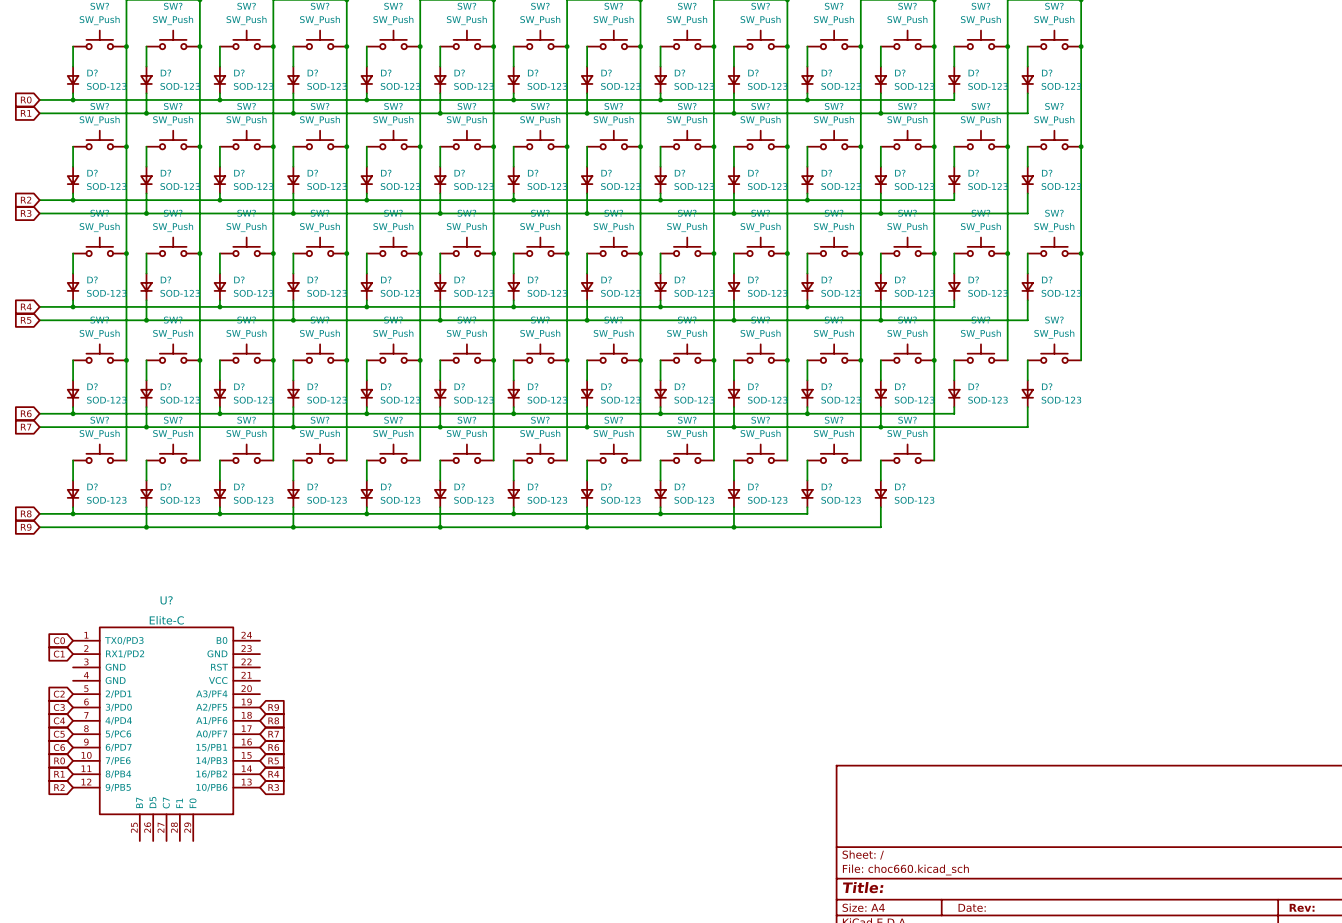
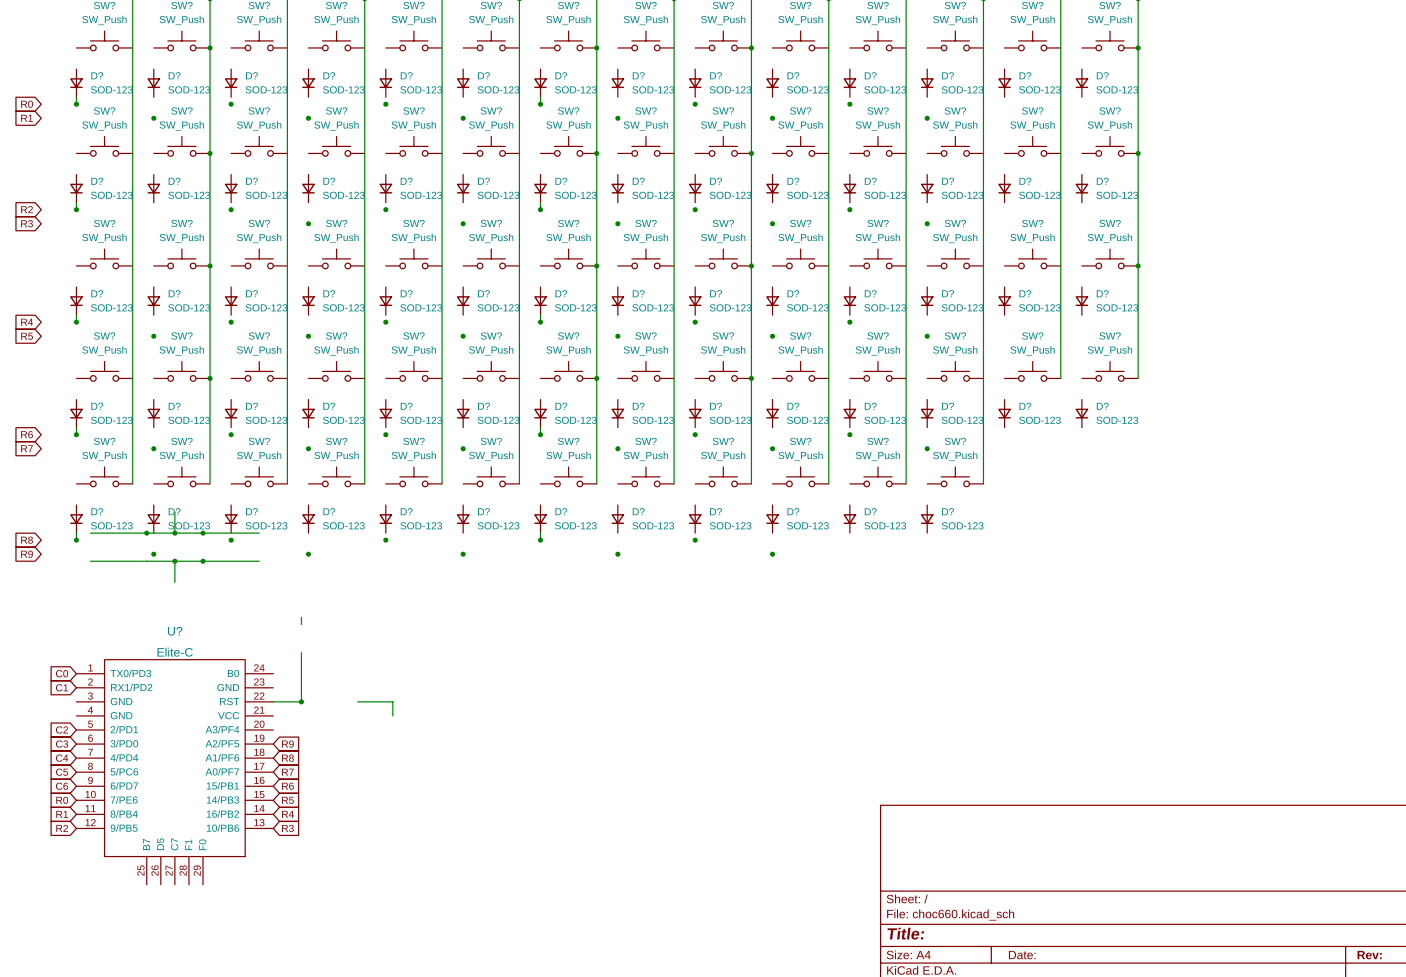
wire: (73, 46) (73, 66) -> none
junction: (126, 46) -> none
wire: (146, 46) (146, 66) -> none
wire: (219, 46) (219, 66) -> none
junction: (273, 46) -> none
wire: (293, 46) (293, 66) -> none
junction: (346, 46) -> none
wire: (366, 46) (366, 66) -> none
junction: (420, 46) -> none
wire: (440, 46) (440, 66) -> none
junction: (493, 46) -> none
wire: (513, 46) (513, 66) -> none
wire: (587, 46) (587, 66) -> none
junction: (640, 46) -> none
wire: (660, 46) (660, 66) -> none
wire: (733, 46) (733, 66) -> none
junction: (787, 46) -> none
wire: (807, 46) (807, 66) -> none
junction: (860, 46) -> none
wire: (880, 46) (880, 66) -> none
junction: (934, 46) -> none
wire: (954, 46) (954, 66) -> none
junction: (1007, 46) -> none
wire: (1027, 46) (1027, 66) -> none
wire: (146, 93) (146, 113) -> none
wire: (219, 93) (219, 99) -> none
wire: (293, 93) (293, 113) -> none
wire: (366, 93) (366, 99) -> none
wire: (440, 93) (440, 113) -> none
wire: (587, 93) (587, 113) -> none
wire: (660, 93) (660, 99) -> none
wire: (733, 93) (733, 113) -> none
wire: (807, 93) (807, 99) -> none
wire: (880, 93) (880, 113) -> none
wire: (954, 93) (954, 99) (39, 99) -> none
wire: (1027, 93) (1027, 113) (39, 113) -> none
wire: (73, 146) (73, 166) -> none
junction: (126, 146) -> none
wire: (146, 146) (146, 166) -> none
wire: (219, 146) (219, 166) -> none
junction: (273, 146) -> none
wire: (293, 146) (293, 166) -> none
junction: (346, 146) -> none
wire: (366, 146) (366, 166) -> none
junction: (420, 146) -> none
wire: (440, 146) (440, 166) -> none
junction: (493, 146) -> none
wire: (513, 146) (513, 166) -> none
wire: (587, 146) (587, 166) -> none
junction: (640, 146) -> none
wire: (660, 146) (660, 166) -> none
wire: (733, 146) (733, 166) -> none
junction: (787, 146) -> none
wire: (807, 146) (807, 166) -> none
junction: (860, 146) -> none
wire: (880, 146) (880, 166) -> none
junction: (934, 146) -> none
wire: (954, 146) (954, 166) -> none
junction: (1007, 146) -> none
wire: (1027, 146) (1027, 166) -> none
wire: (146, 193) (146, 213) -> none
wire: (219, 193) (219, 200) -> none
wire: (293, 193) (293, 213) -> none
wire: (366, 193) (366, 200) -> none
wire: (440, 193) (440, 213) -> none
wire: (587, 193) (587, 213) -> none
wire: (660, 193) (660, 200) -> none
wire: (733, 193) (733, 213) -> none
wire: (807, 193) (807, 200) -> none
wire: (880, 193) (880, 213) -> none
wire: (954, 193) (954, 200) (39, 200) -> none
wire: (1027, 193) (1027, 213) (39, 213) -> none
junction: (146, 213) -> none
wire: (73, 253) (73, 273) -> none
junction: (126, 253) -> none
wire: (146, 253) (146, 273) -> none
wire: (219, 253) (219, 273) -> none
junction: (273, 253) -> none
wire: (293, 253) (293, 273) -> none
junction: (346, 253) -> none
wire: (366, 253) (366, 273) -> none
junction: (420, 253) -> none
wire: (440, 253) (440, 273) -> none
junction: (493, 253) -> none
wire: (513, 253) (513, 273) -> none
wire: (587, 253) (587, 273) -> none
junction: (640, 253) -> none
wire: (660, 253) (660, 273) -> none
wire: (733, 253) (733, 273) -> none
junction: (787, 253) -> none
wire: (807, 253) (807, 273) -> none
junction: (860, 253) -> none
wire: (880, 253) (880, 273) -> none
junction: (934, 253) -> none
wire: (954, 253) (954, 273) -> none
junction: (1007, 253) -> none
wire: (1027, 253) (1027, 273) -> none
wire: (146, 300) (146, 320) -> none
wire: (219, 300) (219, 306) -> none
wire: (293, 300) (293, 320) -> none
wire: (366, 300) (366, 306) -> none
wire: (440, 300) (440, 320) -> none
wire: (587, 300) (587, 320) -> none
wire: (660, 300) (660, 306) -> none
wire: (733, 300) (733, 320) -> none
wire: (807, 300) (807, 306) -> none
wire: (880, 300) (880, 320) -> none
wire: (954, 300) (954, 306) (39, 306) -> none
wire: (1027, 300) (1027, 320) (39, 320) -> none
wire: (73, 360) (73, 380) -> none
junction: (126, 360) -> none
wire: (146, 360) (146, 380) -> none
wire: (219, 360) (219, 380) -> none
junction: (273, 360) -> none
wire: (293, 360) (293, 380) -> none
junction: (346, 360) -> none
wire: (366, 360) (366, 380) -> none
junction: (420, 360) -> none
wire: (440, 360) (440, 380) -> none
junction: (493, 360) -> none
wire: (513, 360) (513, 380) -> none
wire: (587, 360) (587, 380) -> none
junction: (640, 360) -> none
wire: (660, 360) (660, 380) -> none
wire: (733, 360) (733, 380) -> none
junction: (787, 360) -> none
wire: (807, 360) (807, 380) -> none
junction: (860, 360) -> none
wire: (880, 360) (880, 380) -> none
junction: (934, 360) -> none
wire: (954, 360) (954, 380) -> none
wire: (1027, 360) (1027, 380) -> none
wire: (146, 407) (146, 427) -> none
wire: (219, 407) (219, 413) -> none
wire: (293, 407) (293, 427) -> none
wire: (366, 407) (366, 413) -> none
wire: (440, 407) (440, 427) -> none
wire: (587, 407) (587, 427) -> none
wire: (660, 407) (660, 413) -> none
wire: (733, 407) (733, 427) -> none
wire: (807, 407) (807, 413) -> none
wire: (880, 407) (880, 427) -> none
wire: (954, 407) (954, 413) (39, 413) -> none
wire: (1027, 407) (1027, 427) (39, 427) -> none
wire: (73, 460) (73, 480) -> none
wire: (146, 460) (146, 480) -> (174, 512) (174, 533)
wire: (219, 460) (219, 480) -> none
wire: (293, 460) (293, 480) -> none
wire: (366, 460) (366, 480) -> none
wire: (440, 460) (440, 480) -> none
wire: (513, 460) (513, 480) -> none
wire: (587, 460) (587, 480) -> none
wire: (660, 460) (660, 480) -> none
wire: (733, 460) (733, 480) -> none
wire: (807, 460) (807, 480) -> none
wire: (880, 460) (880, 480) -> none
wire: none -> (90, 533) (259, 533)
junction: none -> (146, 533)
wire: (146, 507) (146, 527) -> (174, 561) (174, 582)
junction: none -> (174, 533)
junction: none -> (203, 533)
wire: (219, 507) (219, 513) -> (301, 617) (301, 624)
wire: (293, 507) (293, 527) -> none
wire: (366, 507) (366, 513) -> none
wire: (440, 507) (440, 527) -> none
wire: (587, 507) (587, 527) -> none
wire: (660, 507) (660, 513) -> none
wire: (733, 507) (733, 527) -> none
wire: (807, 507) (807, 513) (39, 513) -> none
wire: (880, 507) (880, 527) (39, 527) -> none
wire: none -> (90, 561) (259, 561)
junction: none -> (174, 561)
junction: none -> (203, 561)
wire: none -> (301, 652) (301, 701) (273, 701)
junction: none -> (301, 701)
wire: none -> (357, 701) (392, 701) (392, 715)

